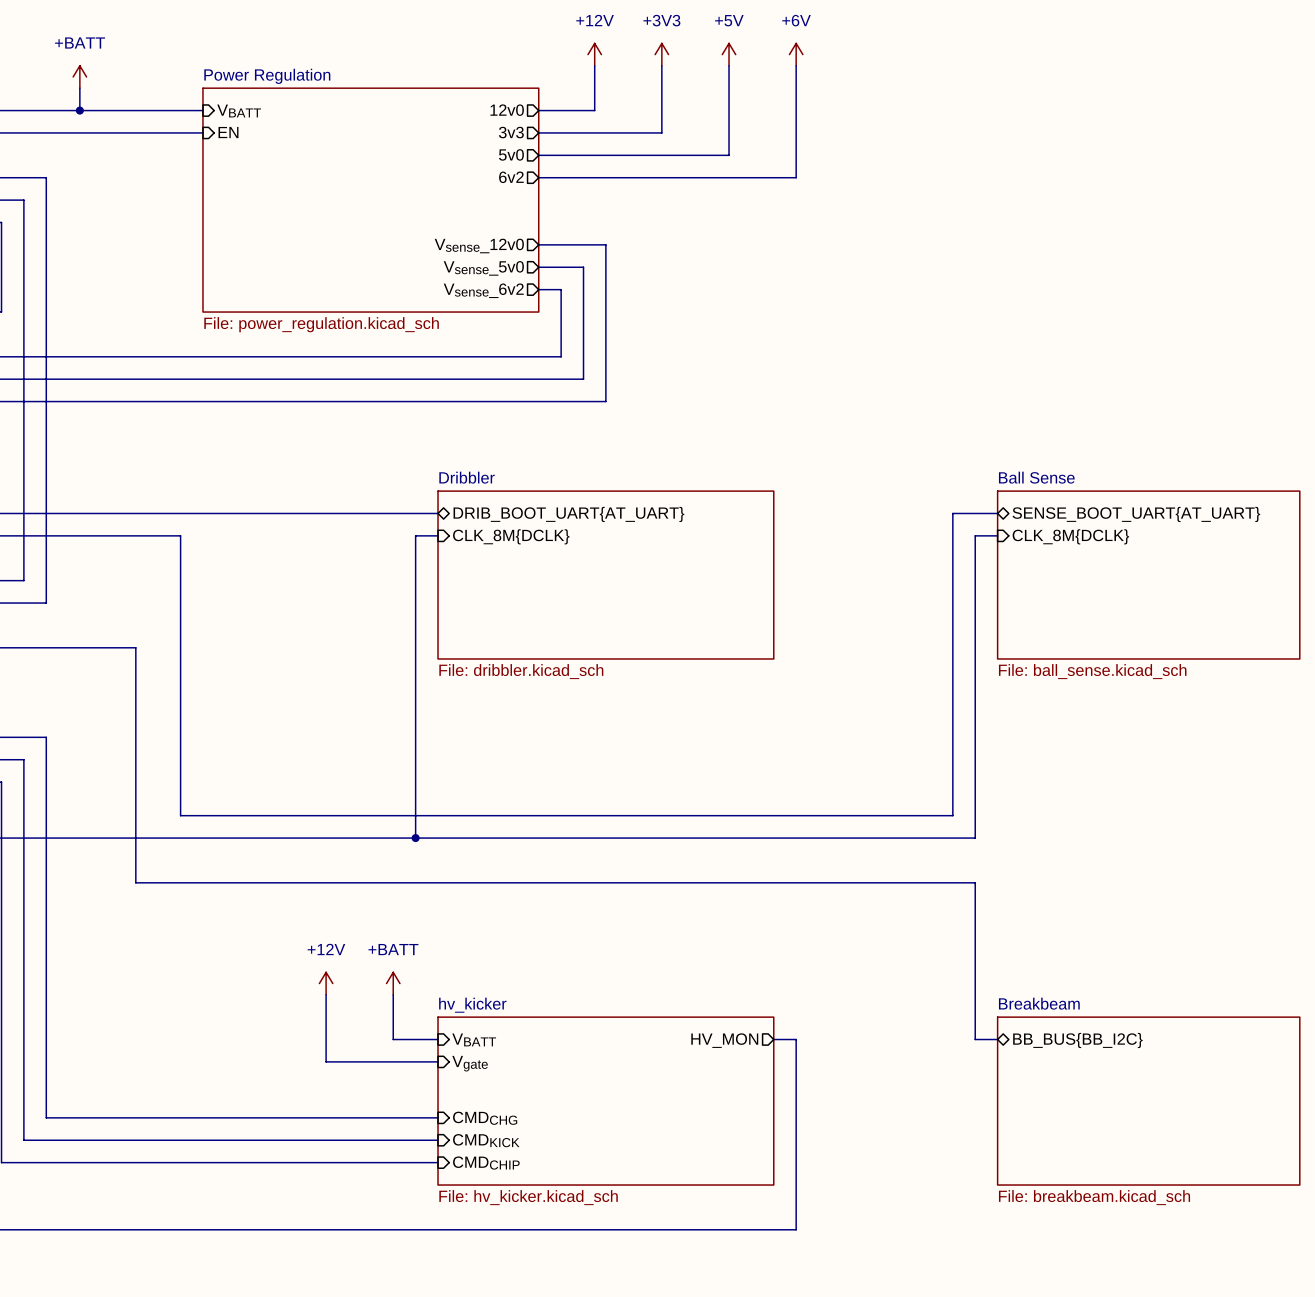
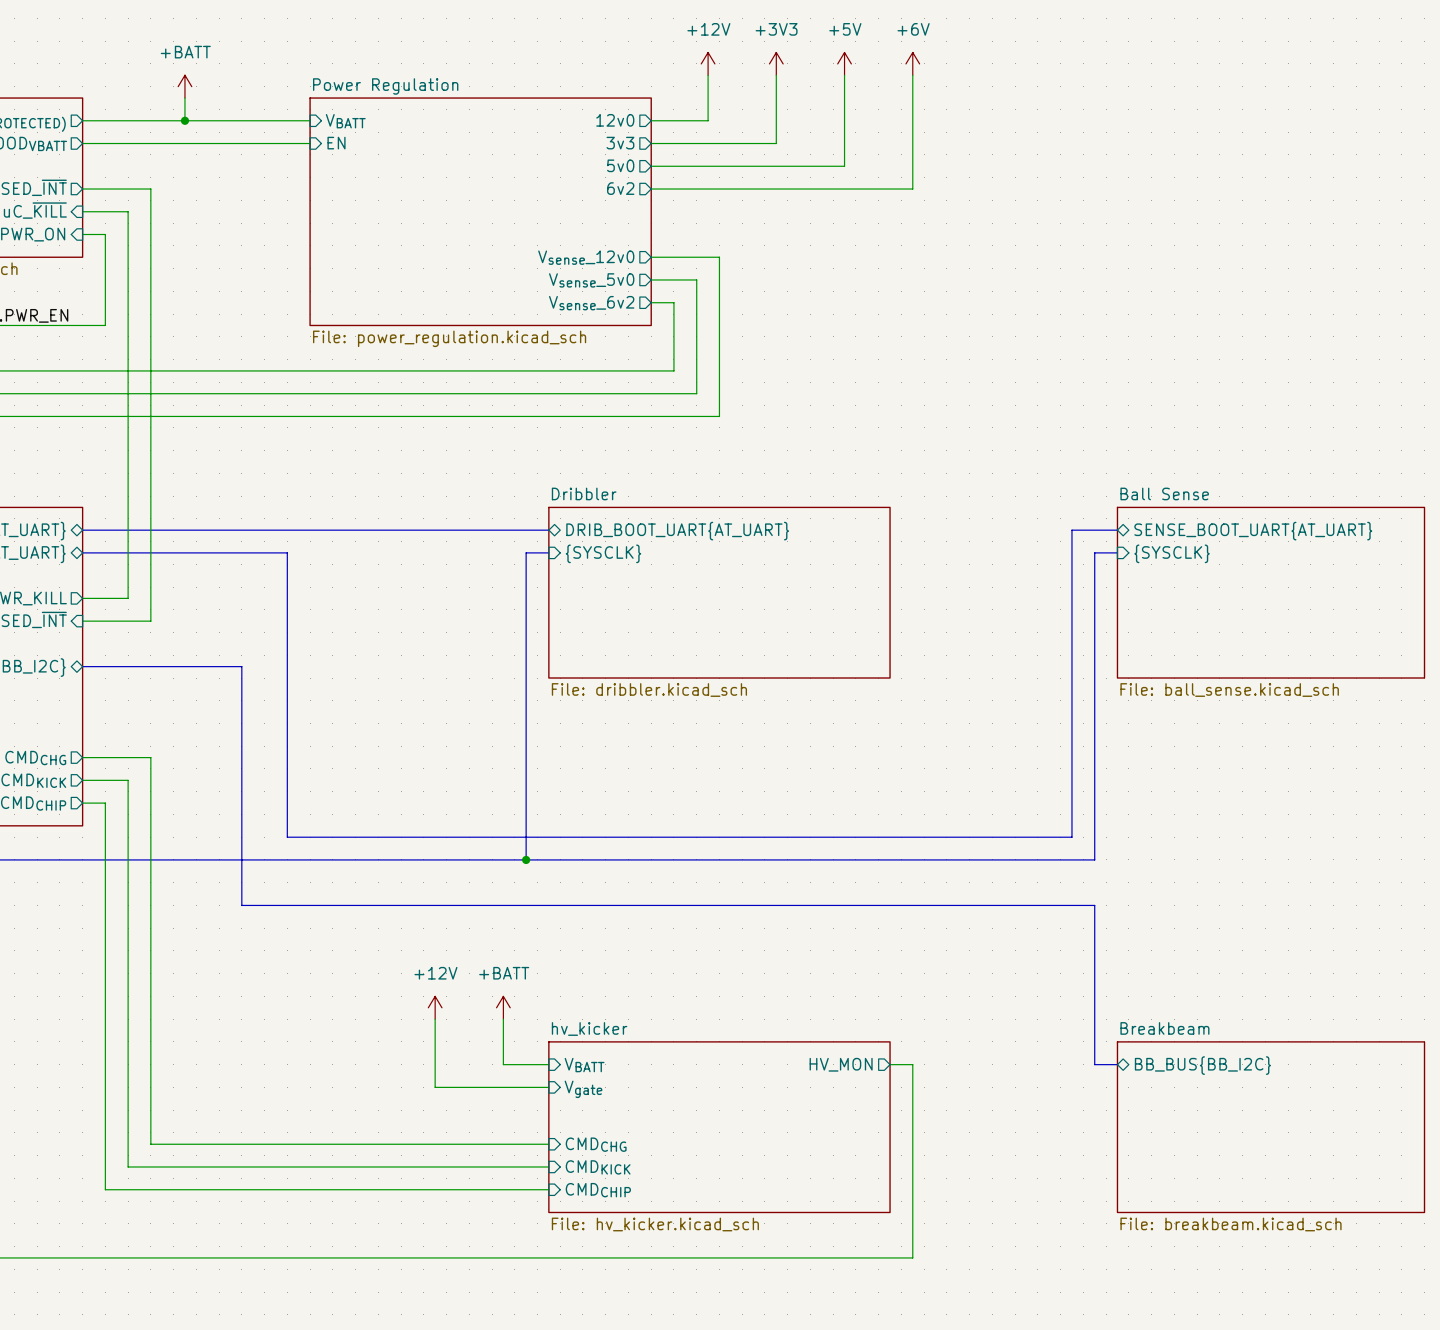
sheet pin: CLK_8M{DCLK} (511, 536) -> {SYSCLK} (603, 553)
sheet pin: CLK_8M{DCLK} (1070, 536) -> {SYSCLK} (1172, 553)

